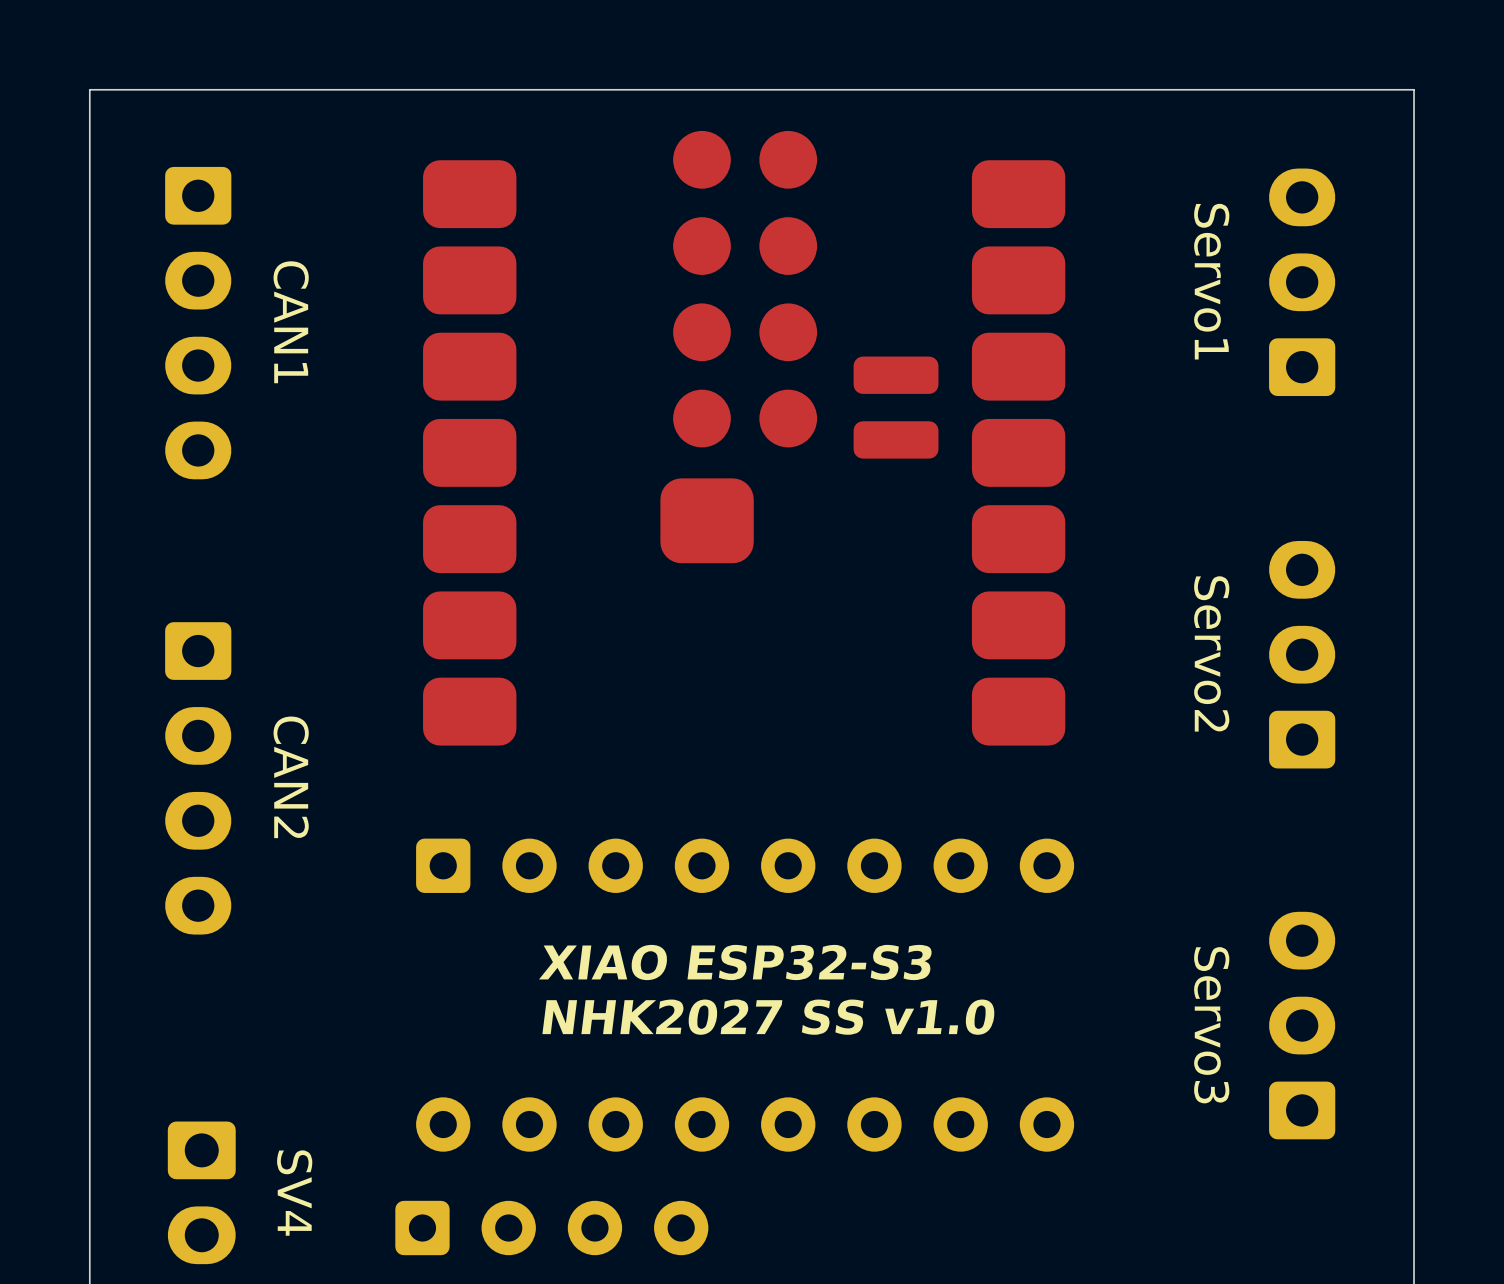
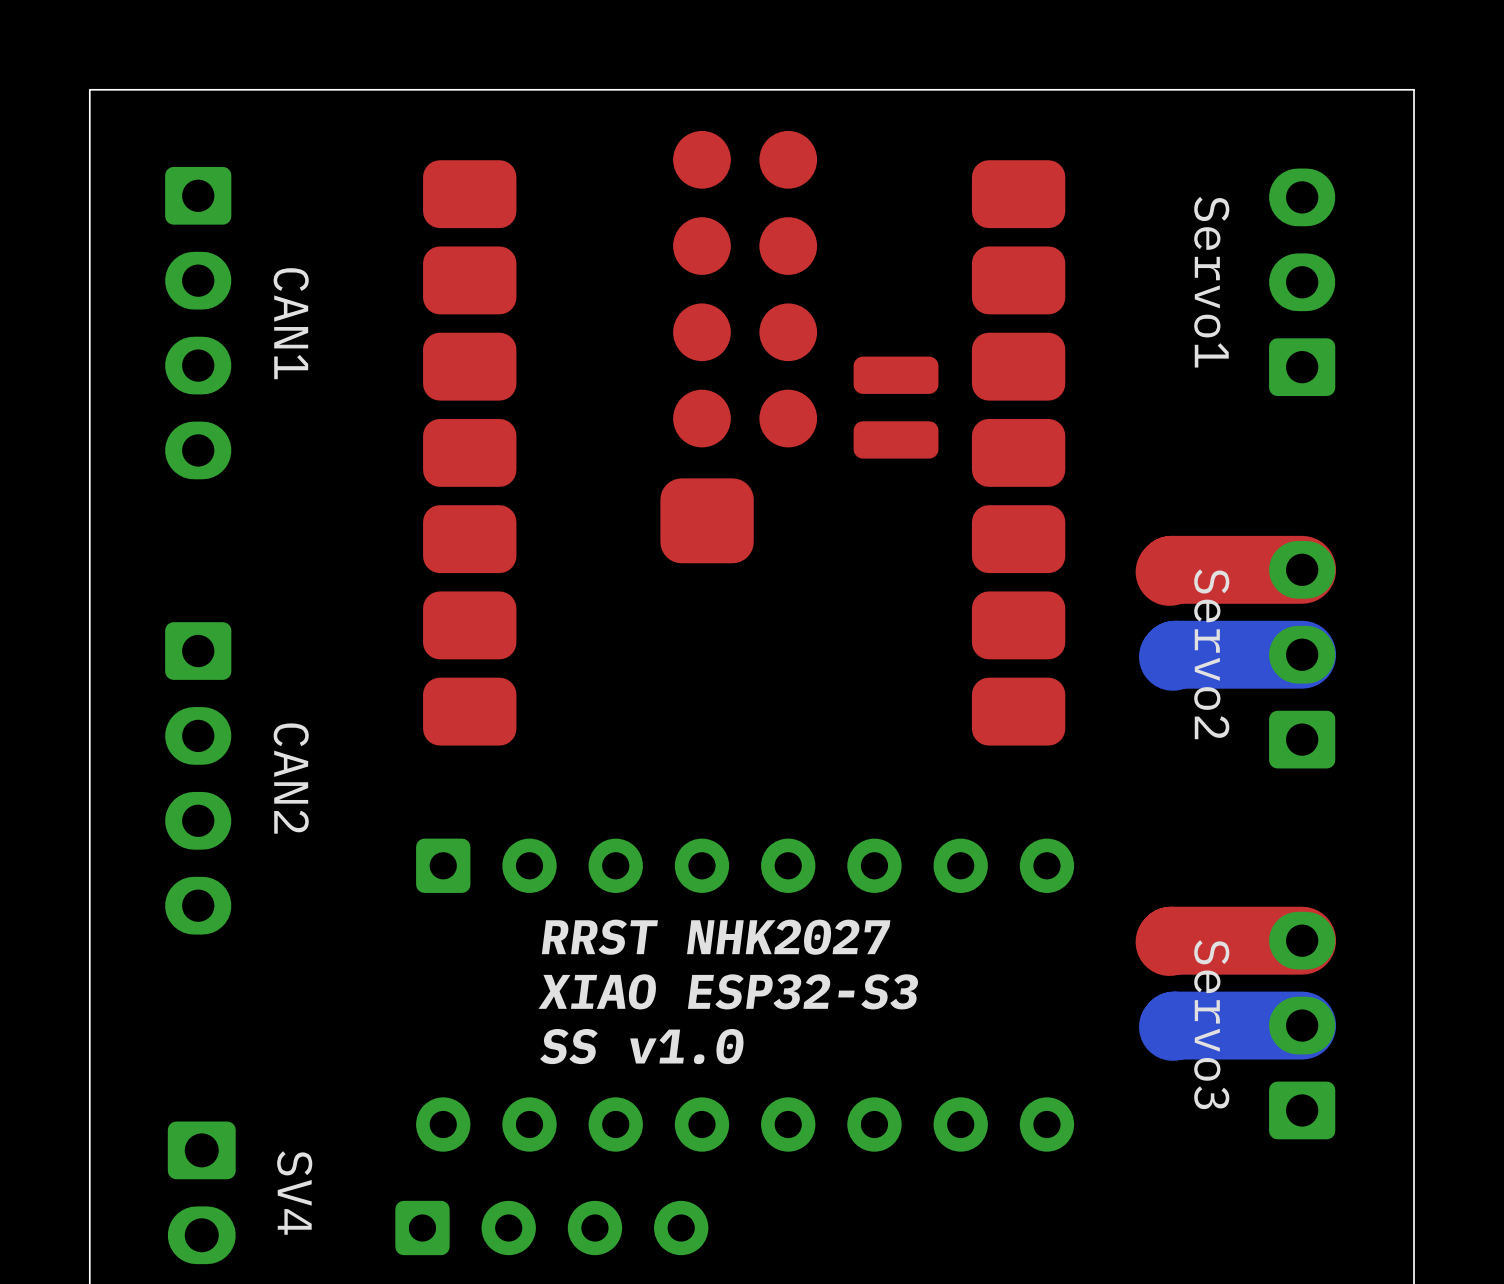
top track: none -> (1302, 569) (1171, 569) (1169, 571)
bottom track: none -> (1302, 654) (1175, 654) (1172, 656)
text: none -> RRST NHK2027 (716, 937)
top track: none -> (1302, 940) (1169, 942)
text position: XIAO ESP32-S3 (735, 962) -> XIAO ESP32-S3 (728, 991)
text: NHK2027 SS v1.0 (768, 1017) -> SS v1.0 (642, 1046)
bottom track: none -> (1302, 1025) (1172, 1026)

